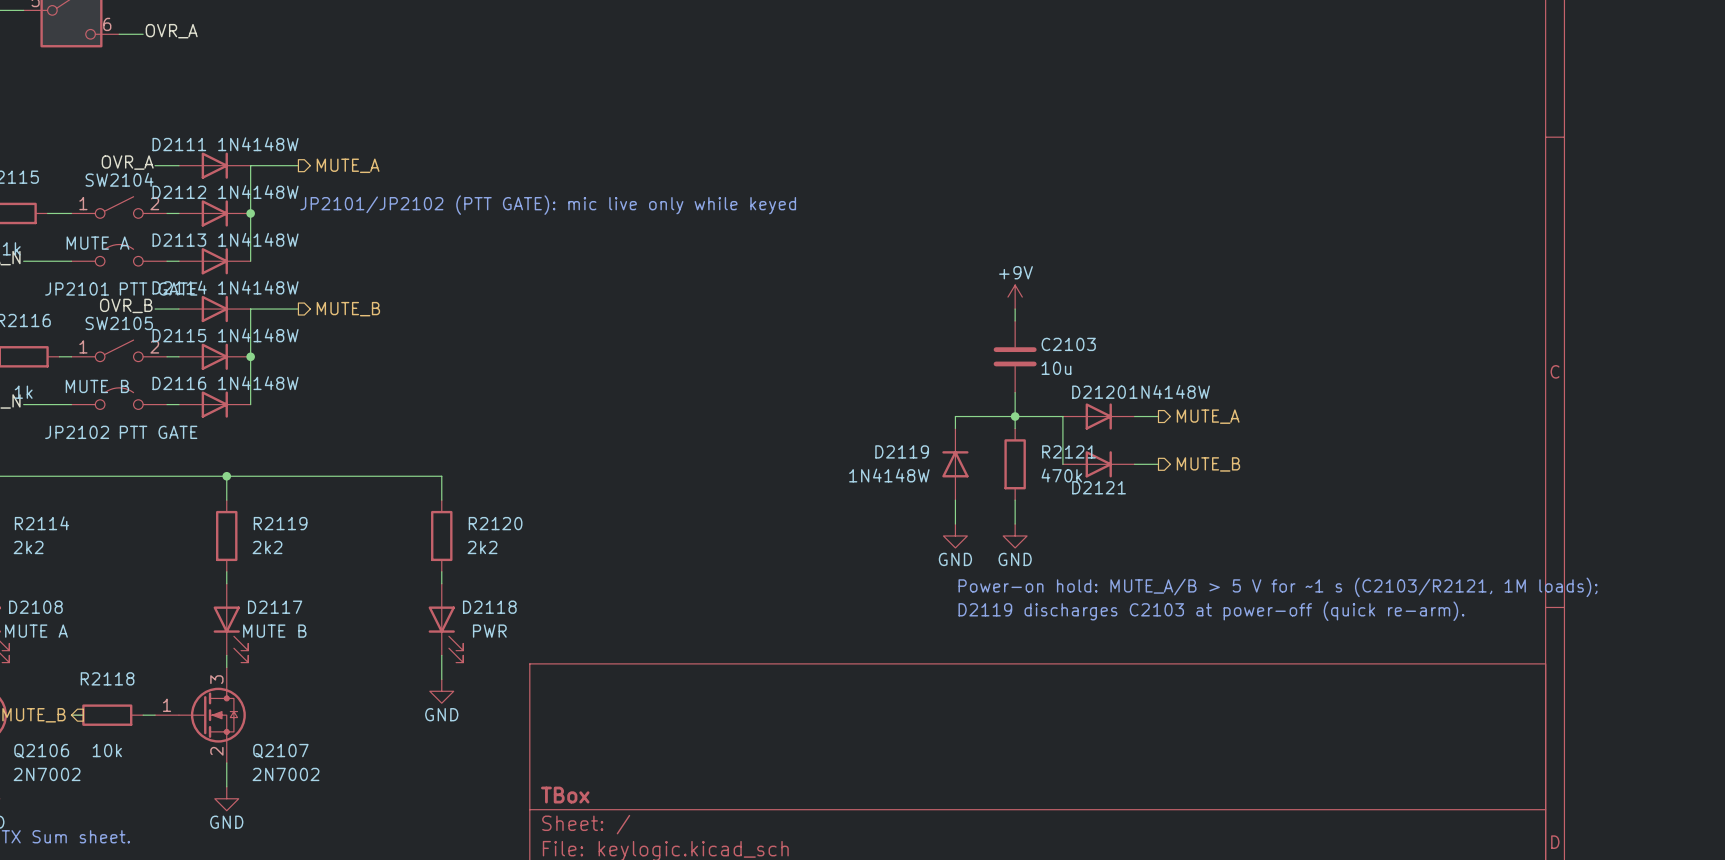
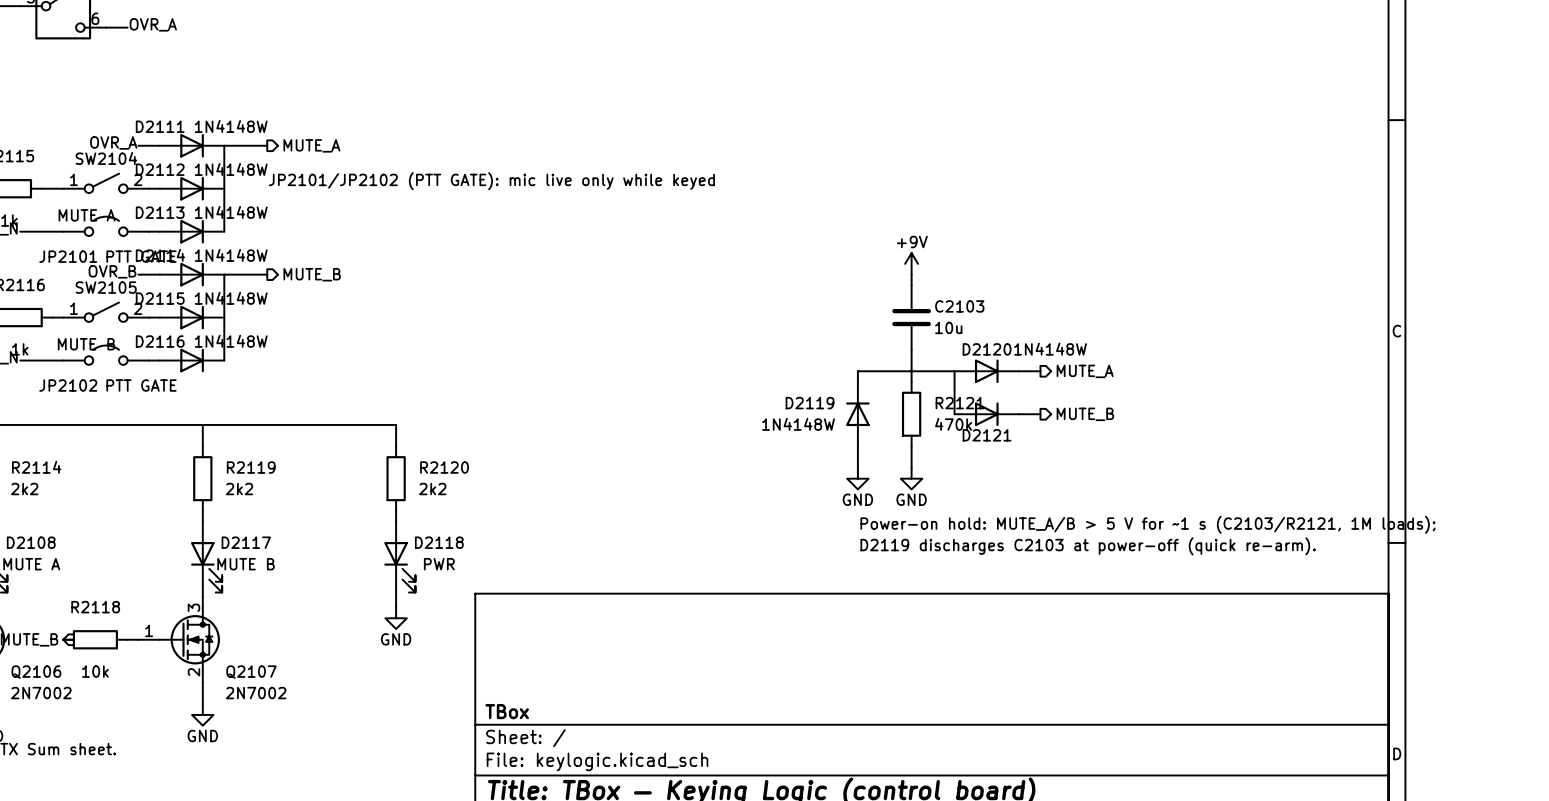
junction: (250, 213) -> none
junction: (250, 356) -> none
junction: (1015, 416) -> none
junction: (226, 476) -> none

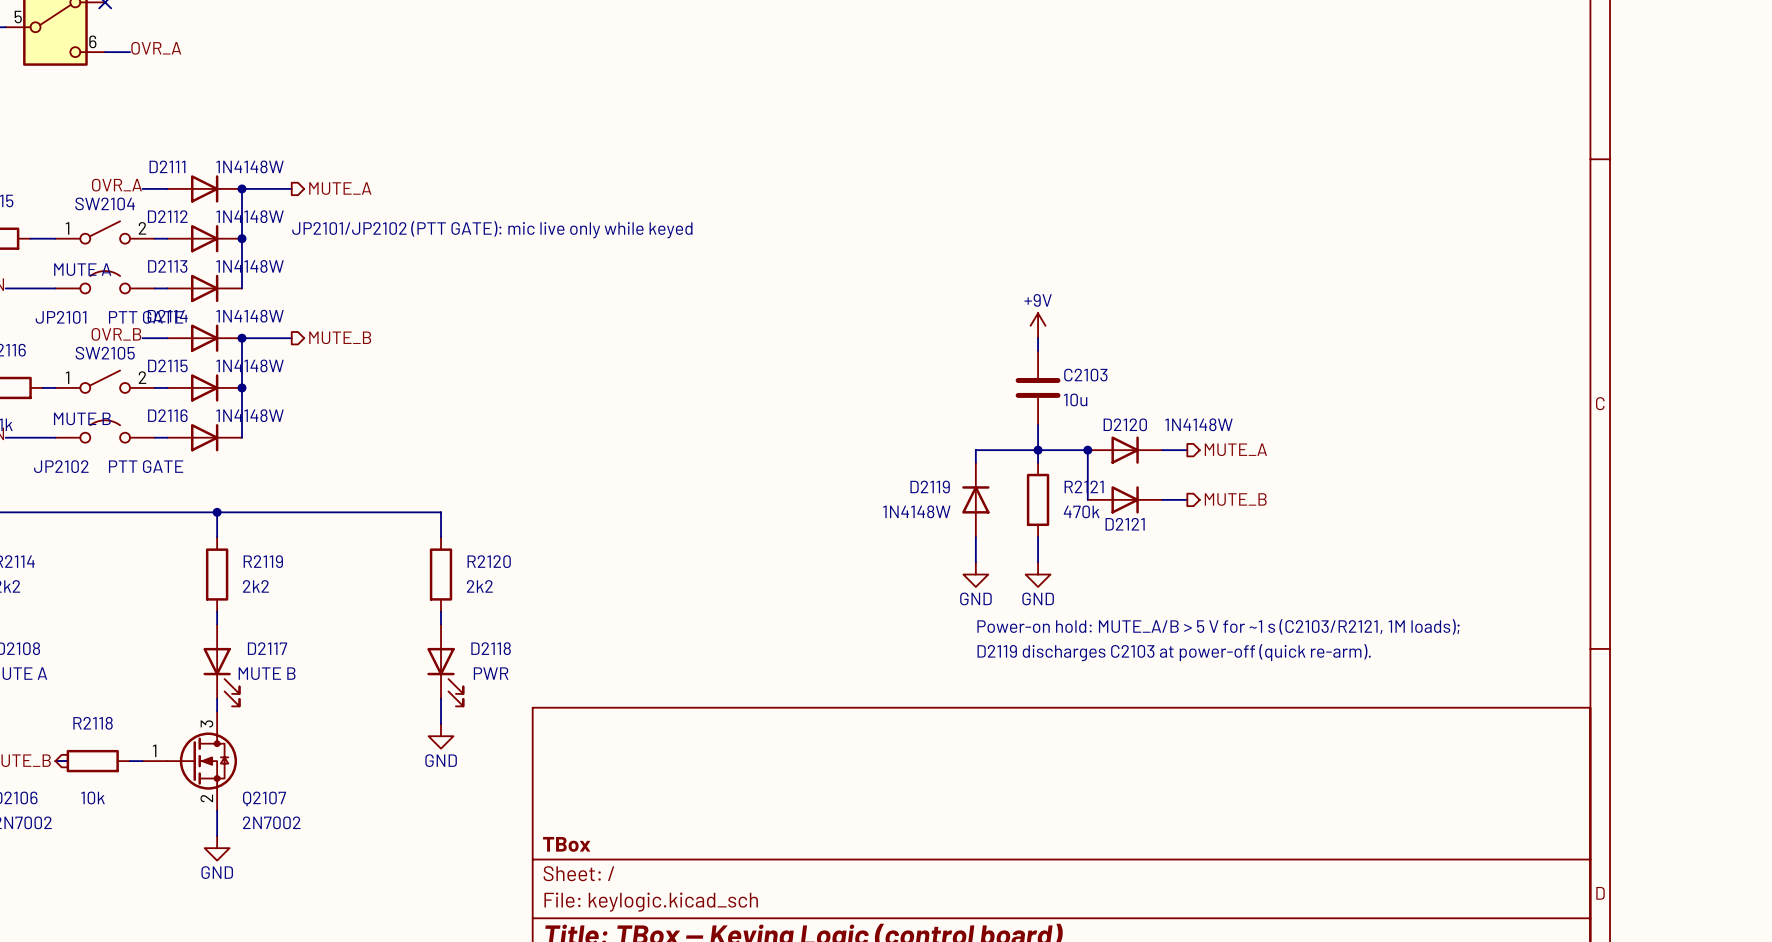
junction: none -> (242, 188)
junction: none -> (242, 238)
junction: none -> (242, 338)
junction: none -> (242, 387)
junction: none -> (1038, 450)
junction: none -> (1087, 450)
junction: none -> (217, 512)

